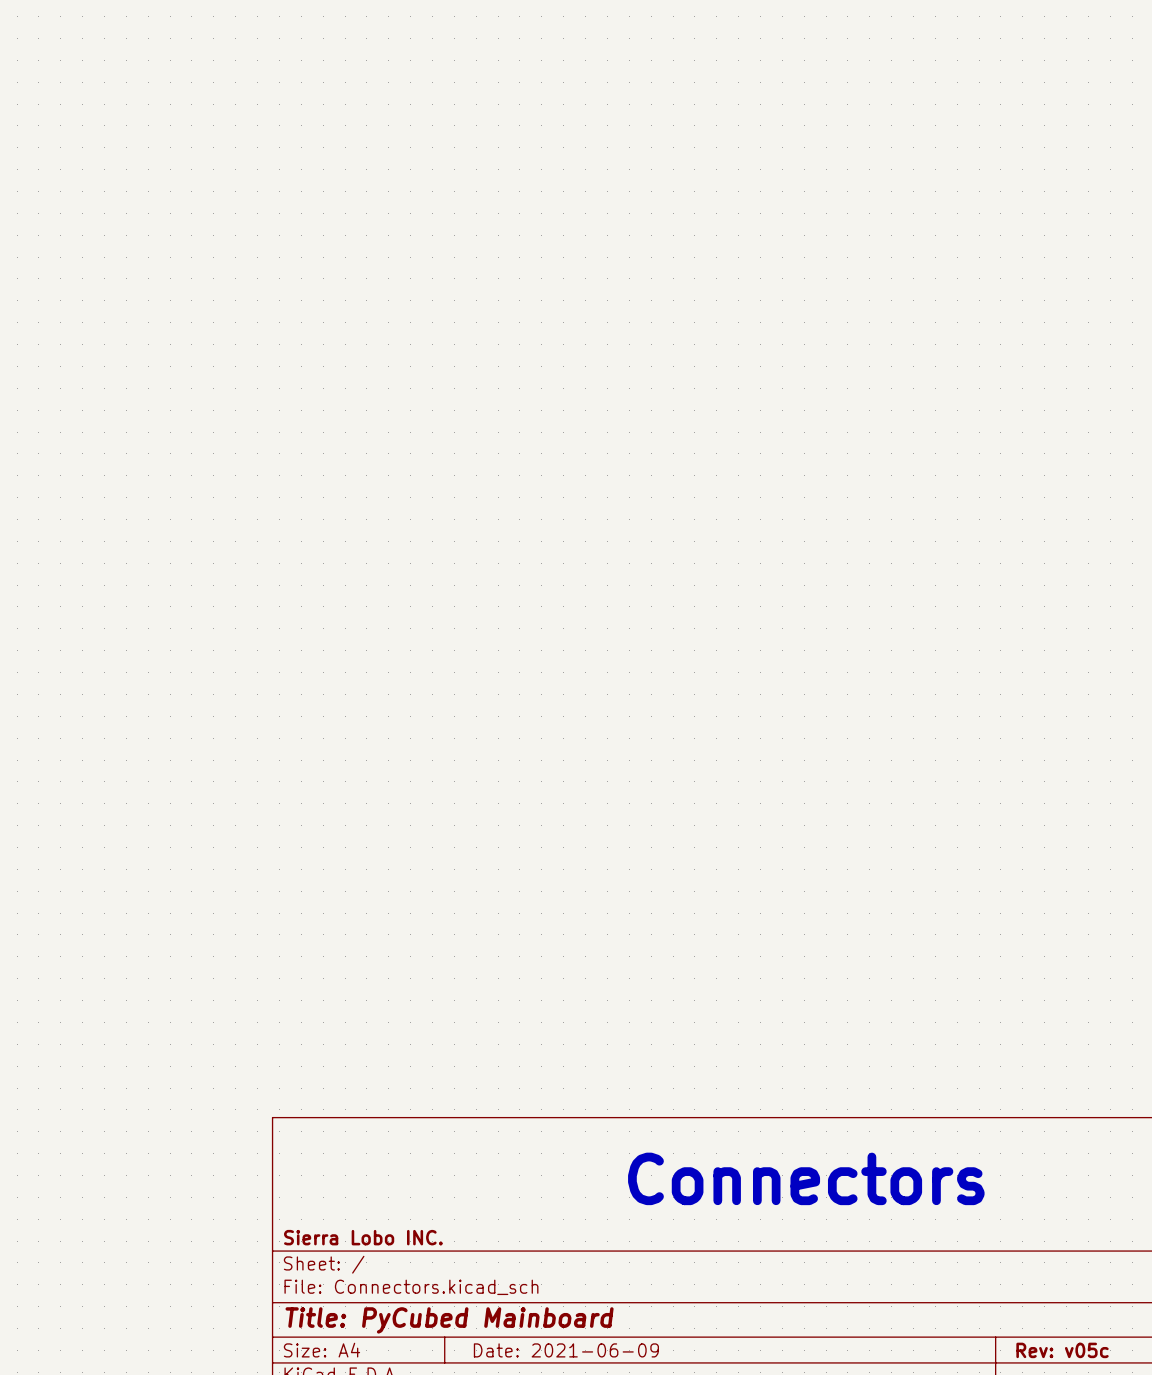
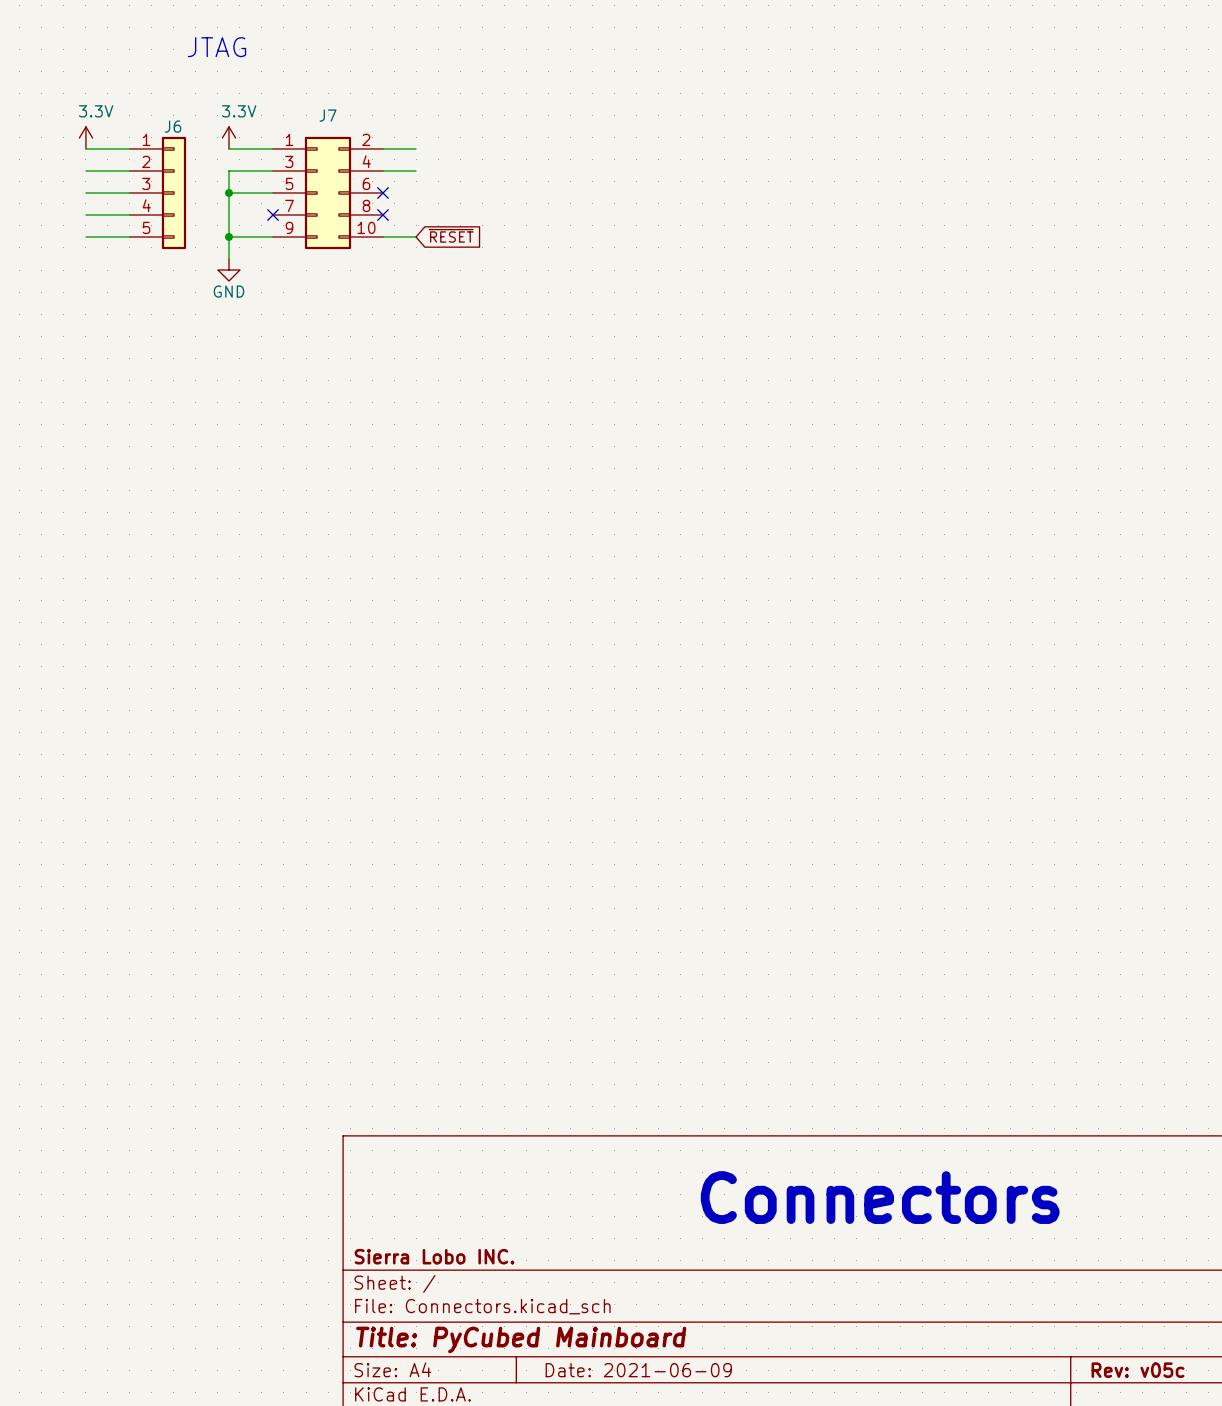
text: none -> JTAG (217, 47)
power symbol: none -> 3.3V (85, 137)
power symbol: none -> 3.3V (228, 137)
wire: none -> (85, 148) (129, 148)
wire: none -> (228, 148) (272, 148)
wire: none -> (383, 148) (416, 148)
wire: none -> (85, 170) (129, 170)
wire: none -> (272, 170) (228, 170) (228, 259)
wire: none -> (383, 170) (416, 170)
wire: none -> (85, 192) (129, 192)
J6: none -> (158, 192)
wire: none -> (228, 192) (272, 192)
junction: none -> (228, 192)
J7: none -> (328, 192)
no-connect mark: none -> (383, 192)
wire: none -> (85, 214) (129, 214)
no-connect mark: none -> (272, 214)
no-connect mark: none -> (383, 214)
global label: none -> ~{RESET} (451, 235)
wire: none -> (85, 236) (129, 236)
wire: none -> (228, 236) (272, 236)
junction: none -> (228, 236)
wire: none -> (383, 236) (416, 236)
power symbol: none -> GND (228, 270)

